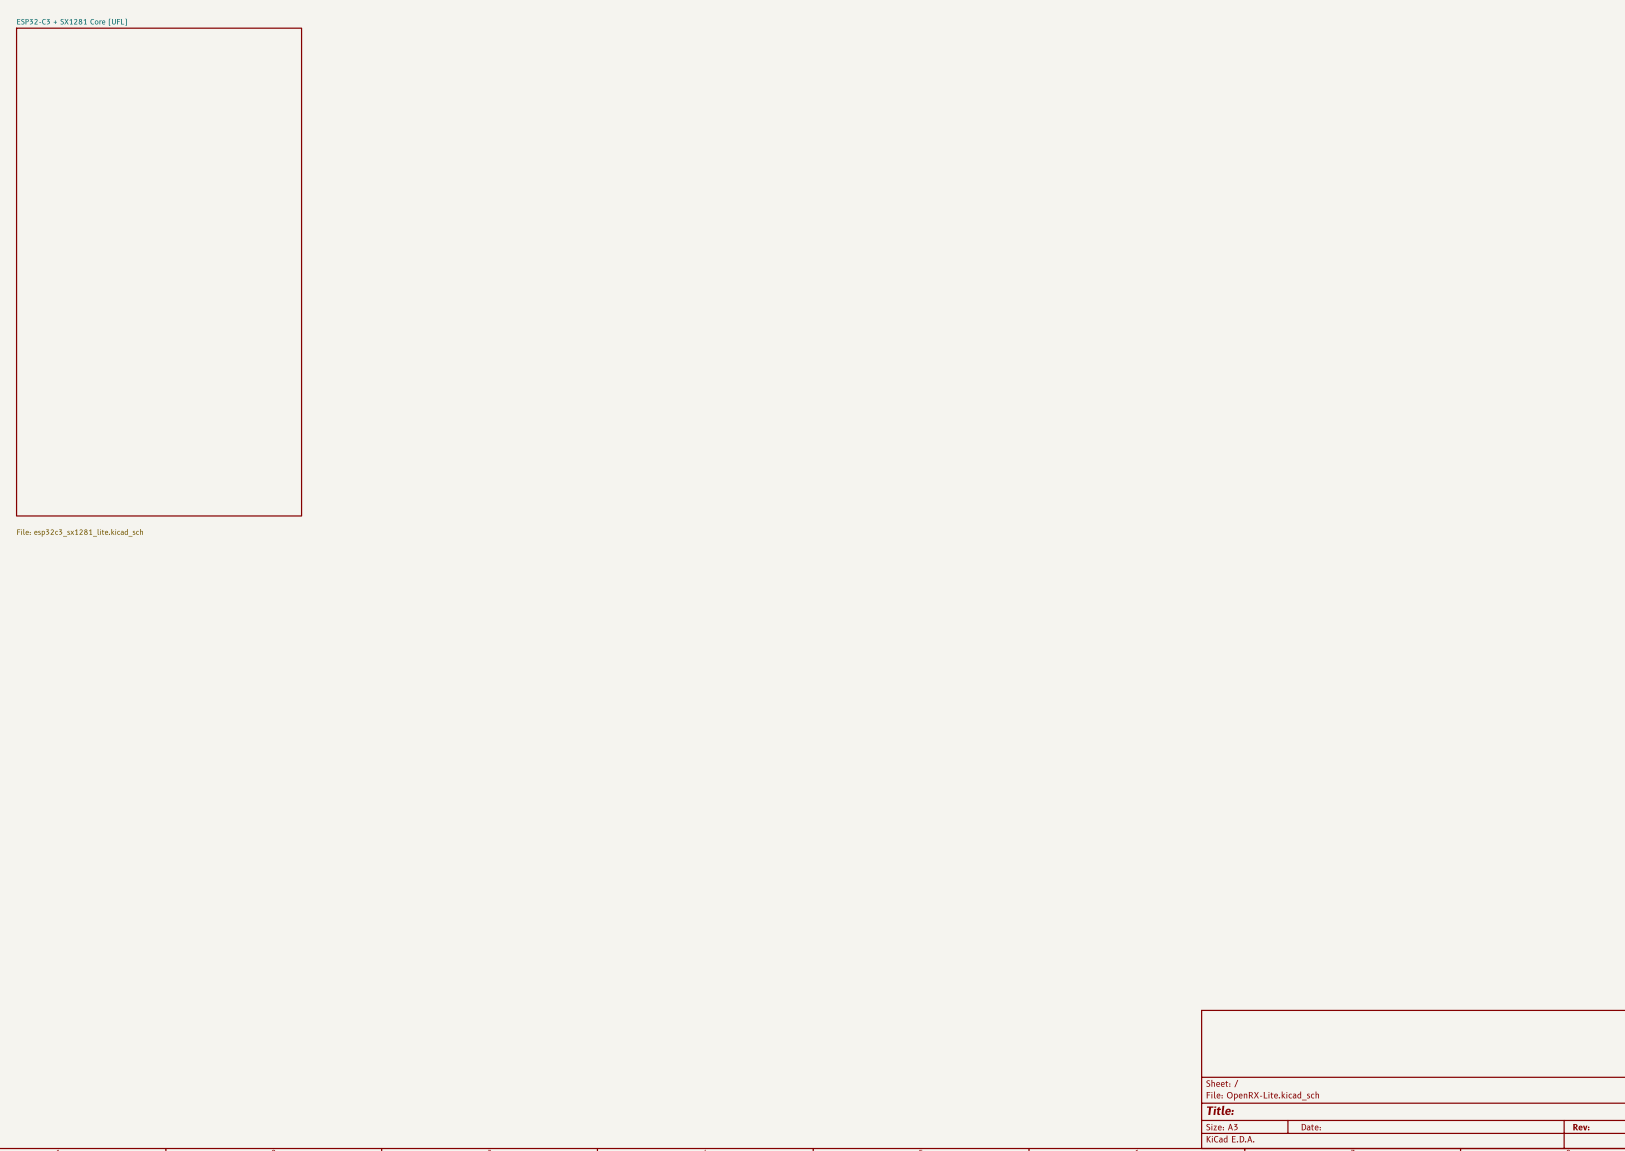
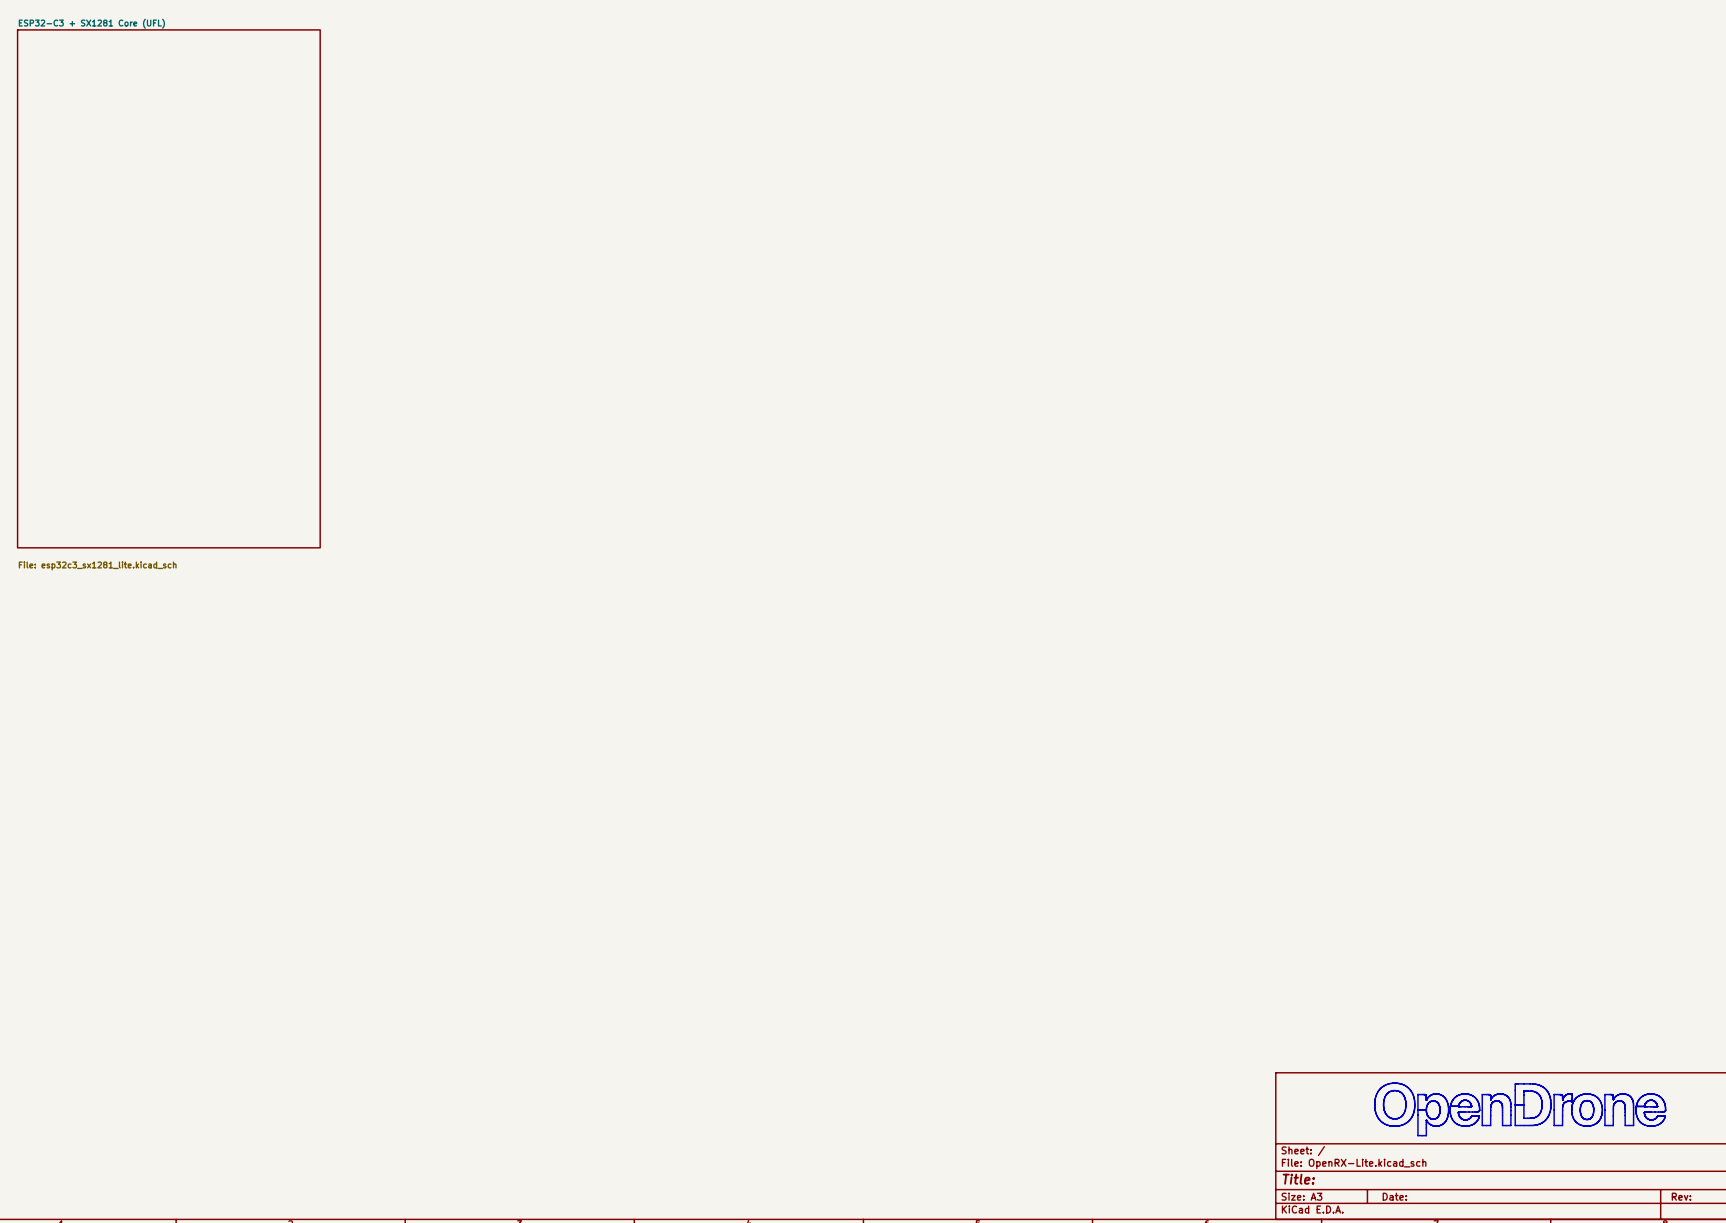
line: none -> (1393, 1083) (1384, 1085) (1378, 1090) (1375, 1098) (1374, 1107) (1376, 1115) (1381, 1121) (1388, 1125) (1397, 1126) (1405, 1123) (1410, 1118) (1414, 1110) (1414, 1101) (1408, 1088) (1402, 1084) (1393, 1083)
line: none -> (1393, 1090) (1401, 1093) (1405, 1101) (1403, 1113) (1396, 1118) (1388, 1116) (1383, 1107) (1385, 1095) (1393, 1090)
line: none -> (1524, 1091) (1523, 1104)
line: none -> (1524, 1091) (1533, 1091) (1539, 1094) (1541, 1101) (1540, 1111) (1535, 1117) (1523, 1118) (1523, 1104)
line: none -> (1571, 1094) (1566, 1094) (1562, 1099)
line: none -> (1571, 1094) (1572, 1101)
line: none -> (1586, 1093) (1575, 1098) (1571, 1110) (1576, 1122) (1587, 1126) (1598, 1121) (1602, 1108) (1597, 1098) (1586, 1093)
line: none -> (1426, 1099) (1433, 1094) (1441, 1095) (1446, 1100) (1448, 1109) (1447, 1118) (1441, 1124) (1433, 1125) (1426, 1120)
line: none -> (1426, 1099) (1425, 1094) (1417, 1094) (1417, 1135) (1426, 1135) (1426, 1120)
line: none -> (1490, 1099) (1490, 1094) (1482, 1094) (1482, 1125) (1490, 1125) (1490, 1105) (1496, 1100) (1502, 1105) (1502, 1125) (1510, 1125) (1510, 1103) (1508, 1097) (1498, 1094) (1490, 1099)
line: none -> (1562, 1099) (1562, 1094) (1554, 1094) (1554, 1125) (1562, 1125) (1562, 1105) (1566, 1101) (1571, 1101)
line: none -> (1613, 1099) (1621, 1094) (1631, 1097) (1633, 1102) (1633, 1125) (1625, 1125) (1624, 1105)
line: none -> (1613, 1099) (1612, 1094) (1604, 1094) (1604, 1125) (1613, 1125) (1615, 1102) (1621, 1101) (1624, 1104)
line: none -> (1586, 1100) (1591, 1102) (1593, 1109) (1592, 1116) (1587, 1119) (1582, 1117) (1580, 1111) (1581, 1103) (1586, 1100)
line: none -> (1523, 1104) (1515, 1104) (1515, 1083) (1539, 1085) (1545, 1089) (1549, 1095) (1550, 1106) (1548, 1115) (1543, 1121) (1537, 1124) (1515, 1125) (1515, 1104)
line: none -> (1450, 1106) (1451, 1118) (1459, 1125) (1472, 1124) (1479, 1116)
line: none -> (1450, 1106) (1453, 1098) (1460, 1094) (1469, 1094) (1476, 1099) (1479, 1111) (1459, 1112)
line: none -> (1471, 1106) (1469, 1101) (1465, 1100) (1460, 1101) (1458, 1106)
line: none -> (1657, 1106) (1655, 1101) (1651, 1100) (1646, 1101) (1644, 1106) (1636, 1106)
line: none -> (1458, 1106) (1471, 1106)
line: none -> (1636, 1106) (1637, 1118) (1645, 1125) (1658, 1124) (1665, 1116)
line: none -> (1636, 1106) (1639, 1098) (1646, 1094) (1656, 1094) (1662, 1099) (1665, 1111) (1645, 1112)
line: none -> (1644, 1106) (1656, 1106)
line: none -> (1417, 1110) (1426, 1110)
line: none -> (1426, 1110) (1428, 1117) (1435, 1118) (1439, 1114) (1439, 1105) (1436, 1101) (1431, 1101) (1427, 1104) (1426, 1110)
line: none -> (1458, 1112) (1460, 1117) (1464, 1119) (1472, 1116) (1479, 1116)
line: none -> (1644, 1112) (1646, 1117) (1650, 1119) (1657, 1116) (1665, 1116)

